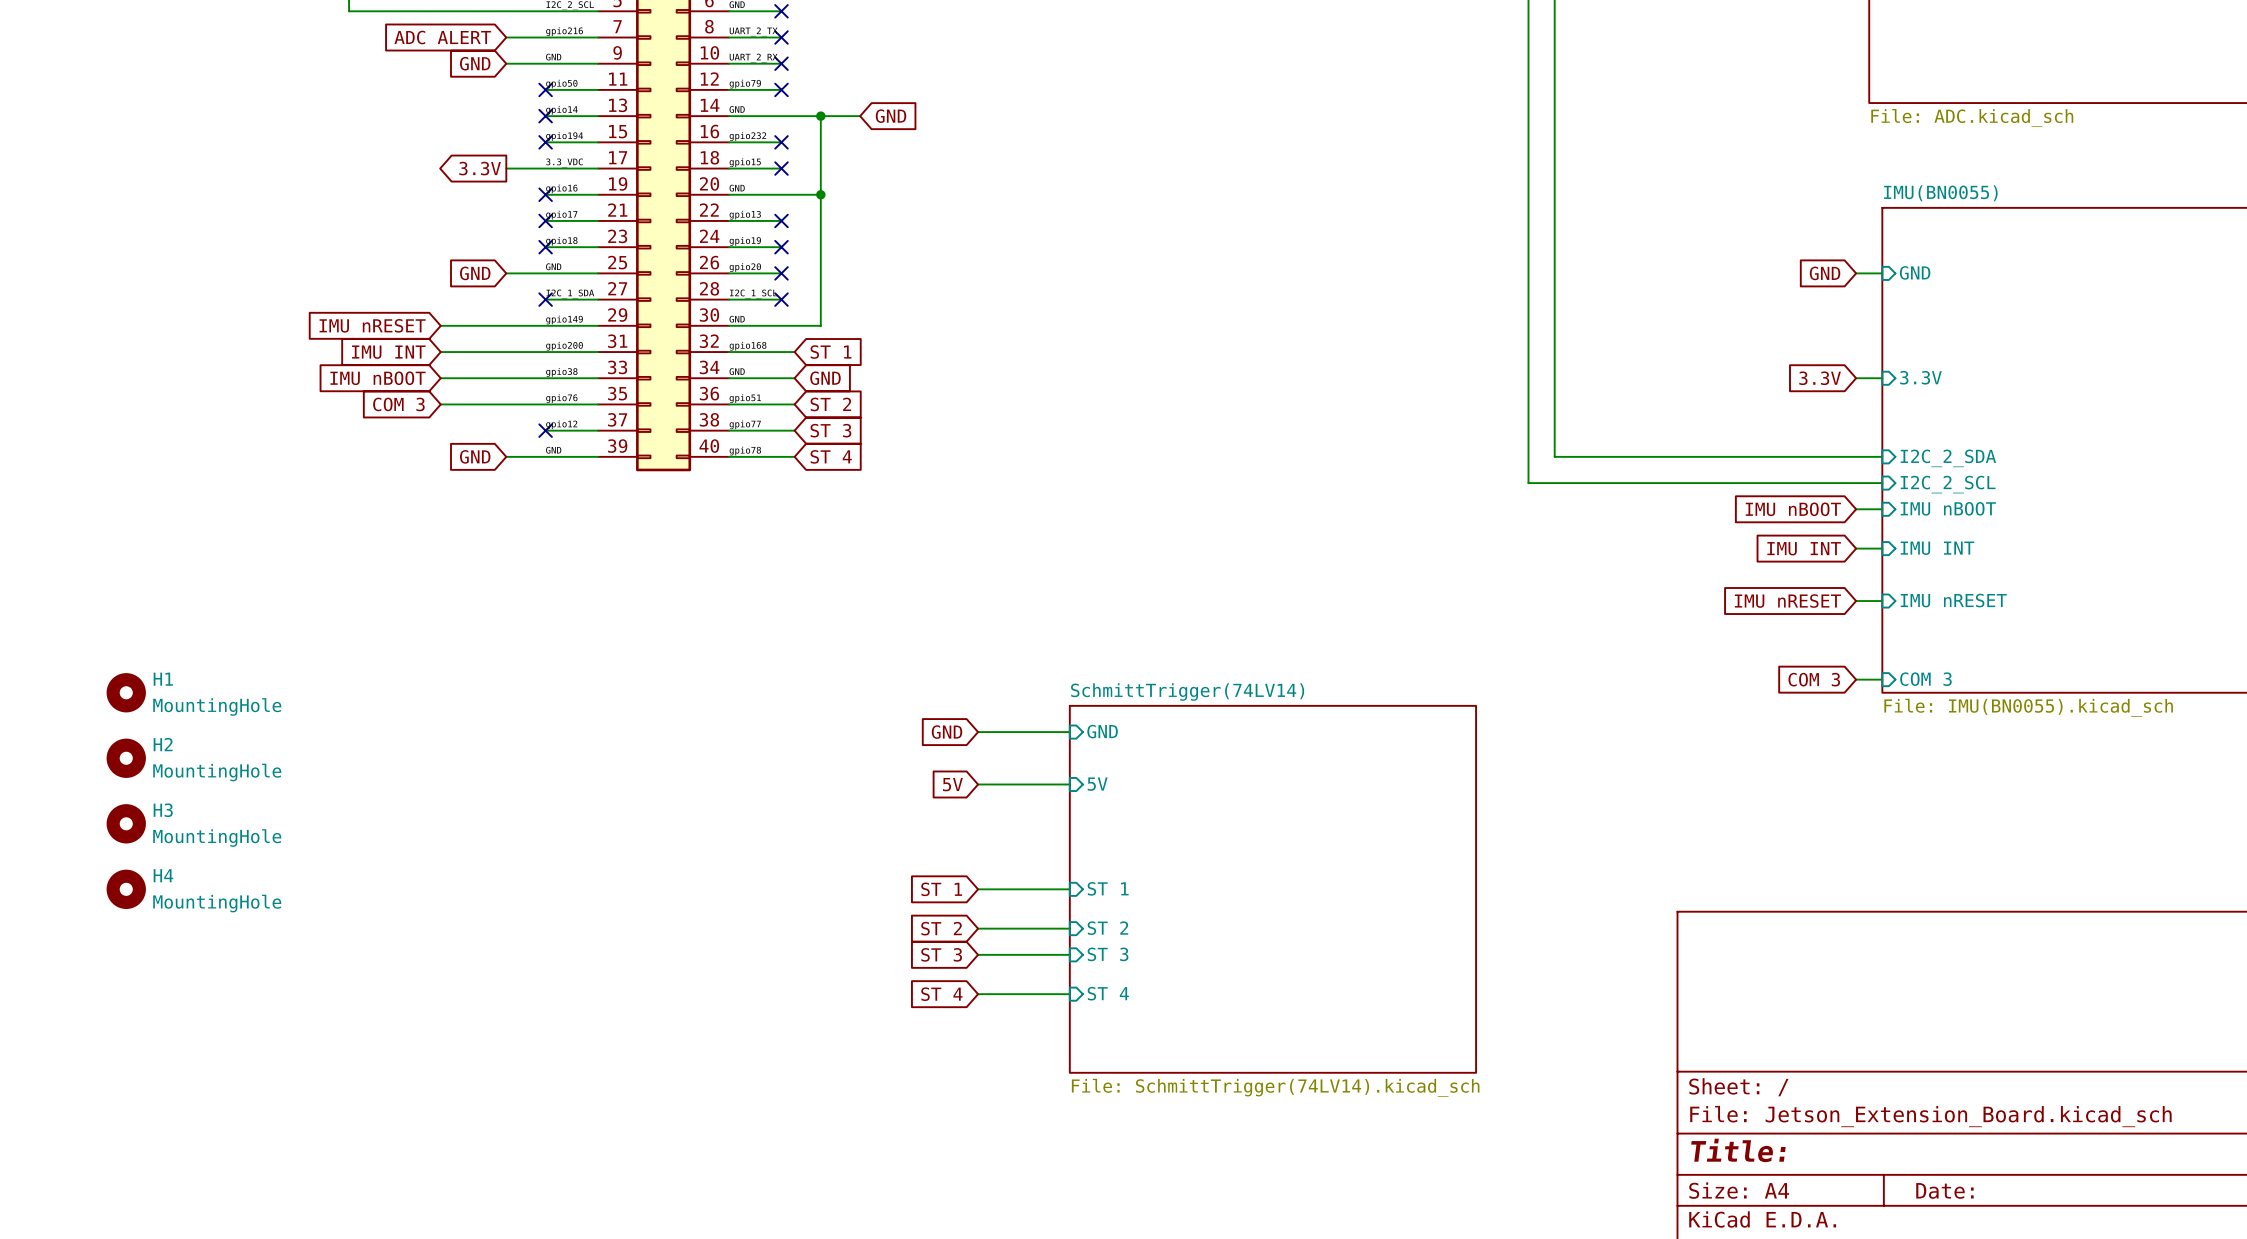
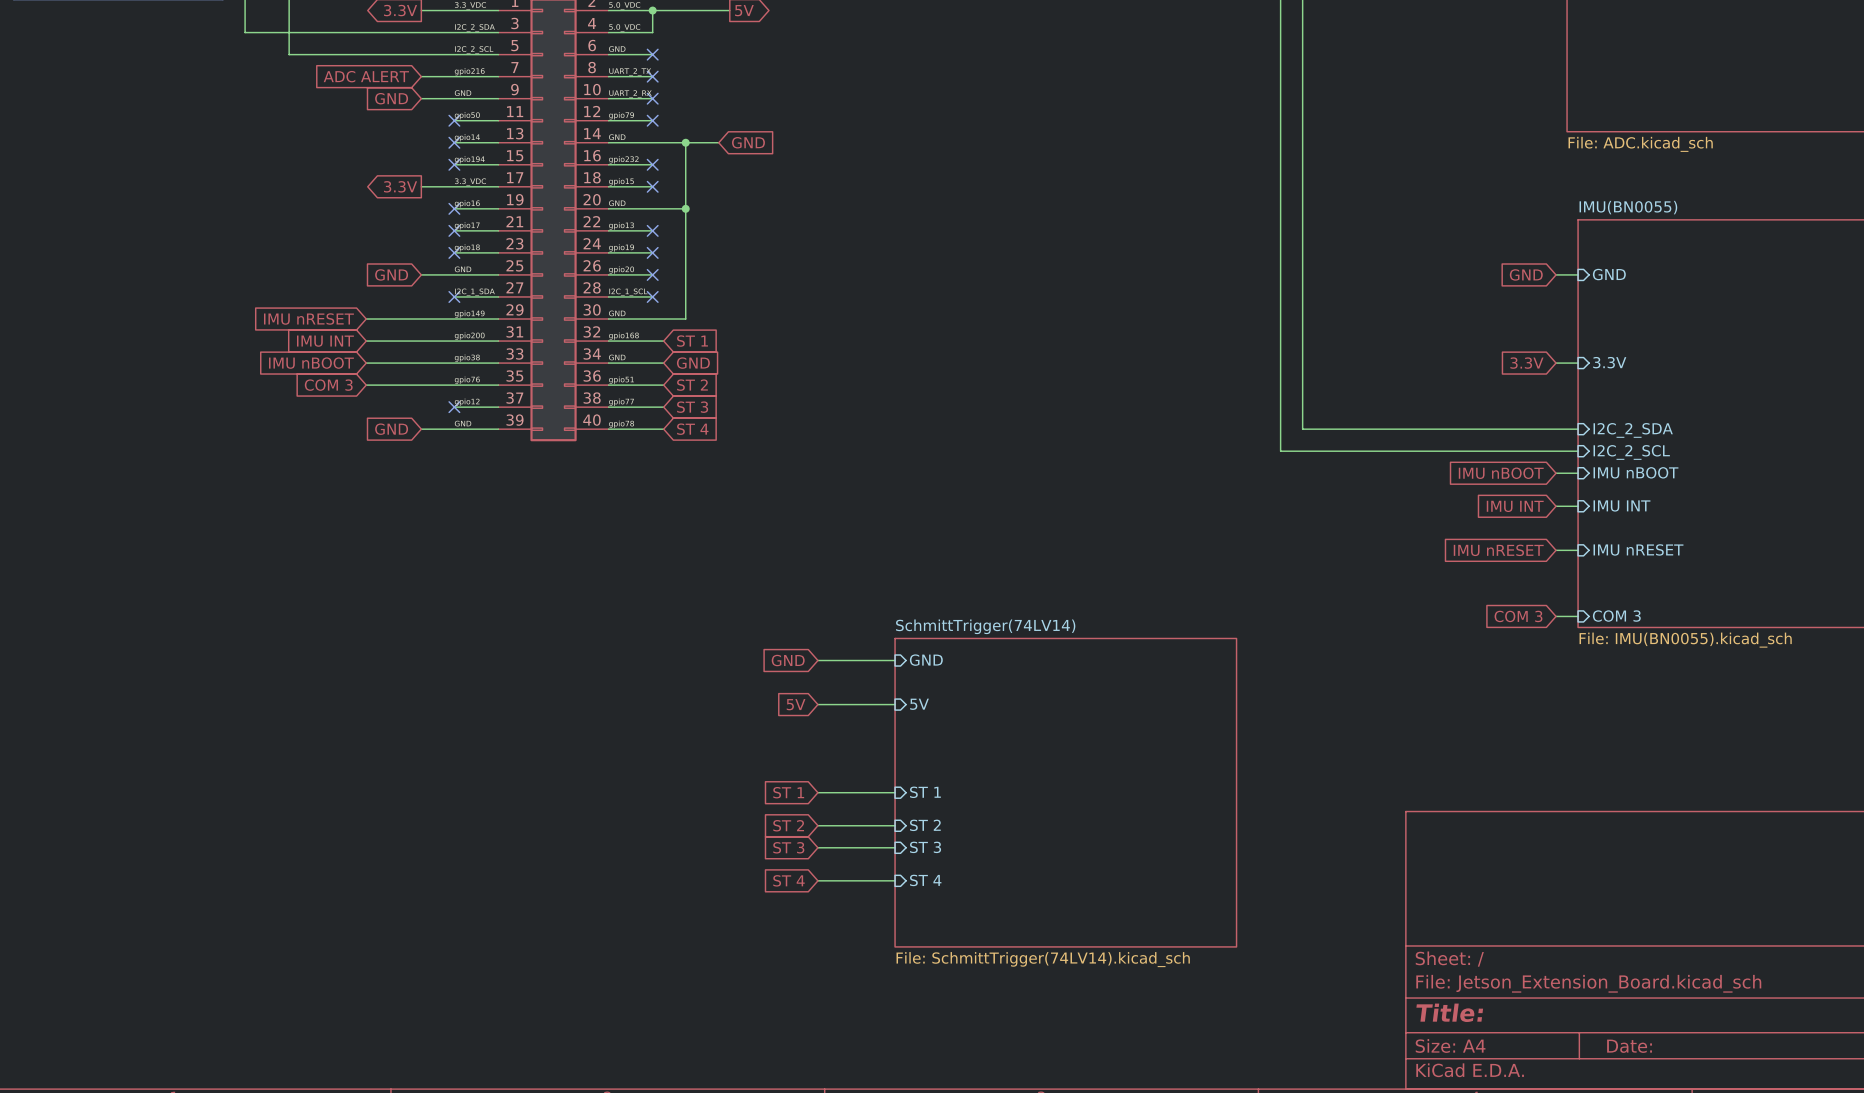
H1: MountingHole (126, 692) -> none
H2: MountingHole (126, 758) -> none
H3: MountingHole (126, 823) -> none
H4: MountingHole (126, 889) -> none

